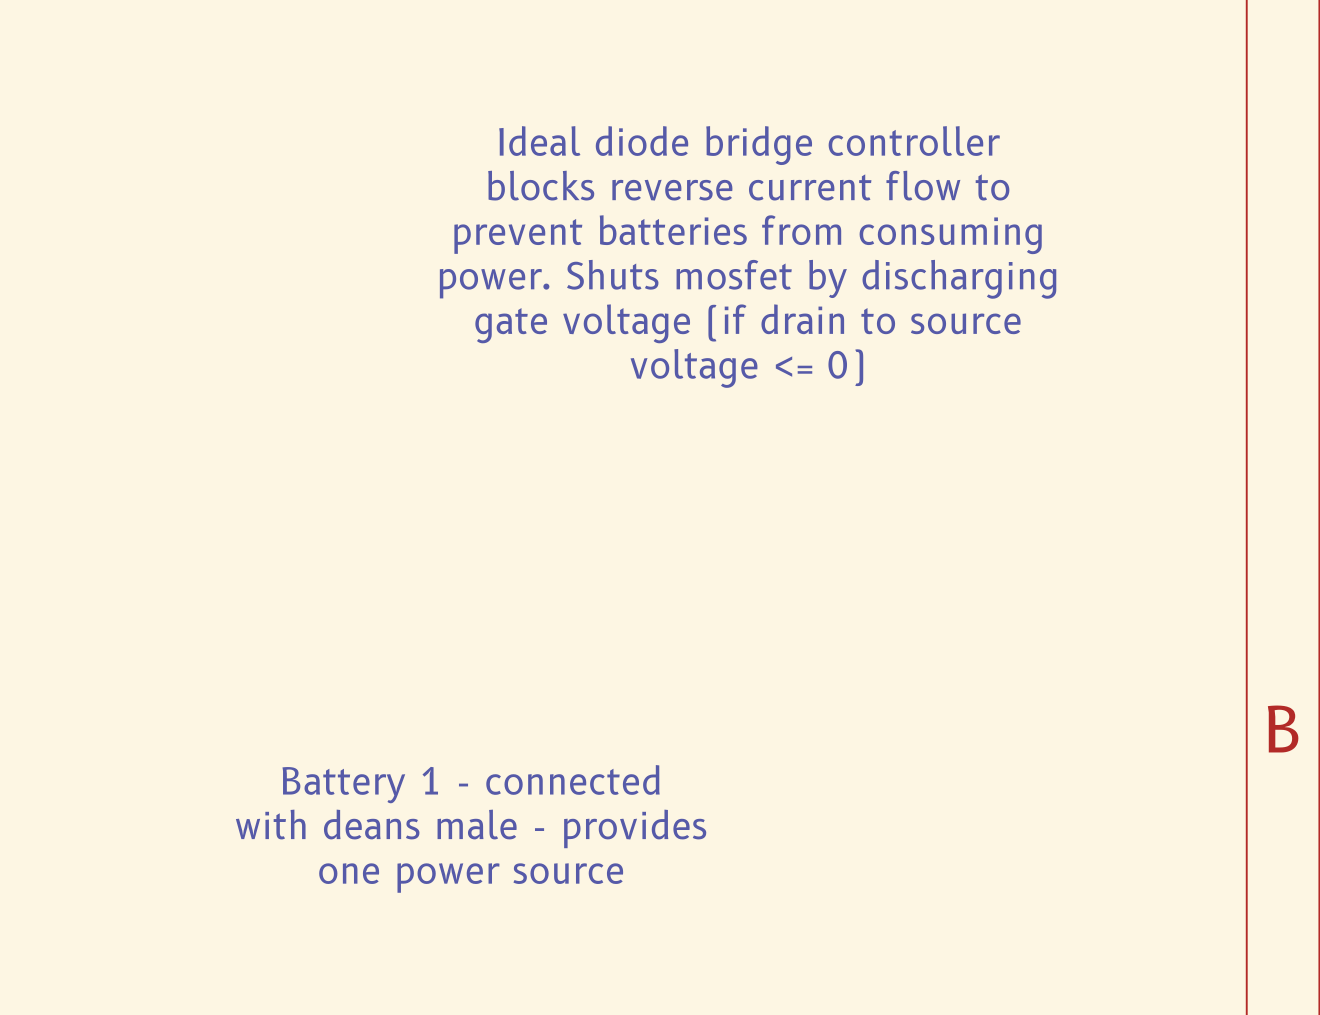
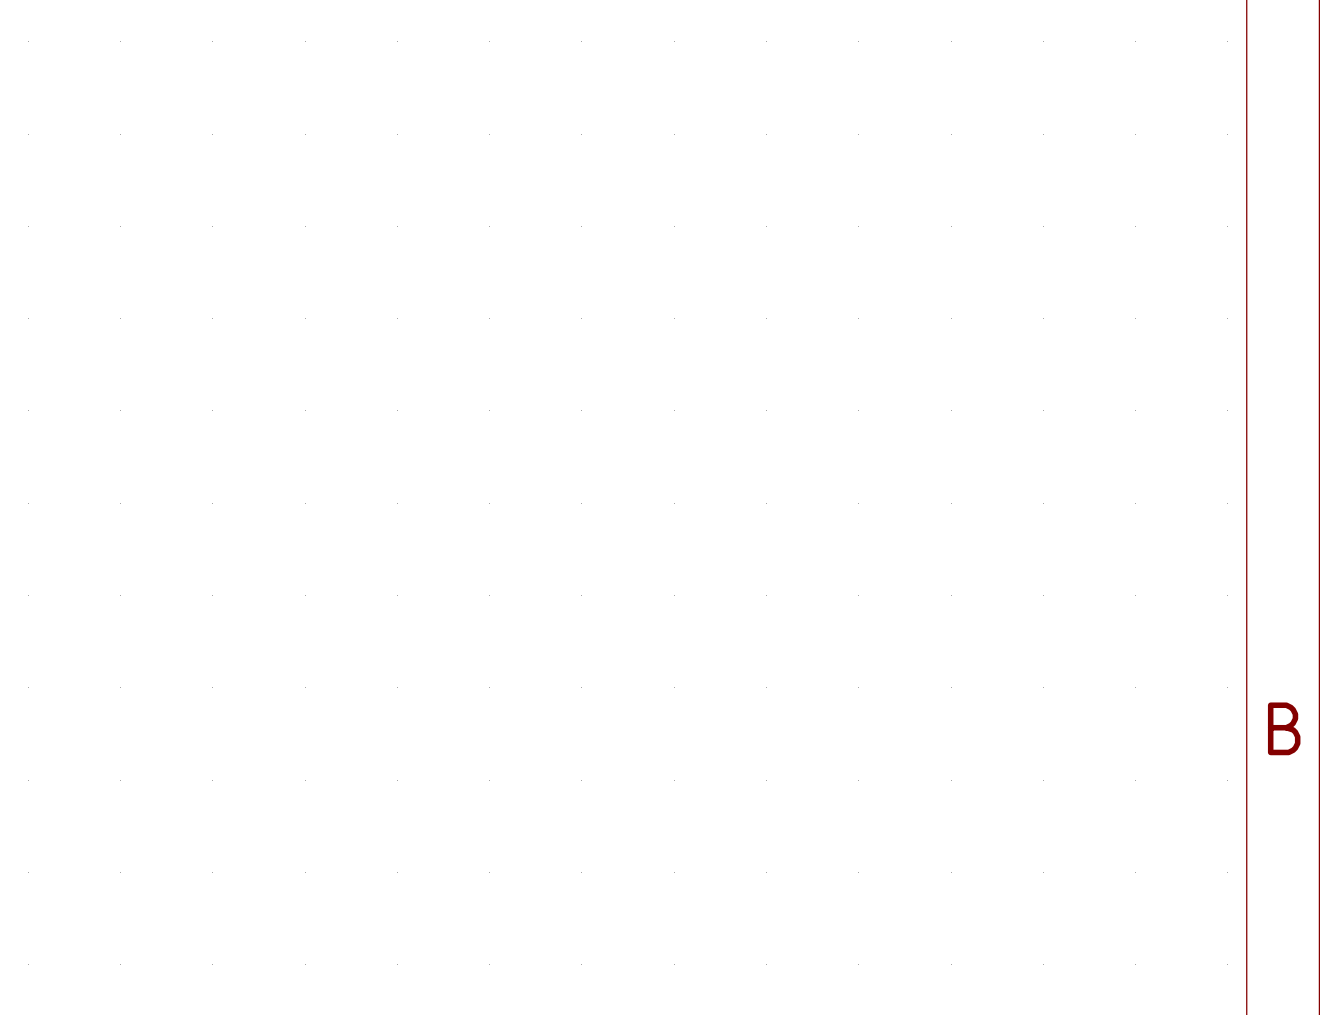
text: Ideal diode bridge controller (749, 145) -> none
text: blocks reverse current flow to (748, 185) -> none
text: prevent batteries from consuming (748, 234) -> none
text: power. Shuts mosfet by discharging (748, 279) -> none
text: gate voltage (if drain to source (747, 323) -> none
text: voltage <= 0) (746, 368) -> none
text: Battery 1 - connected (471, 784) -> none
text: with deans male - provides (471, 828) -> none
text: one power source (471, 878) -> none

